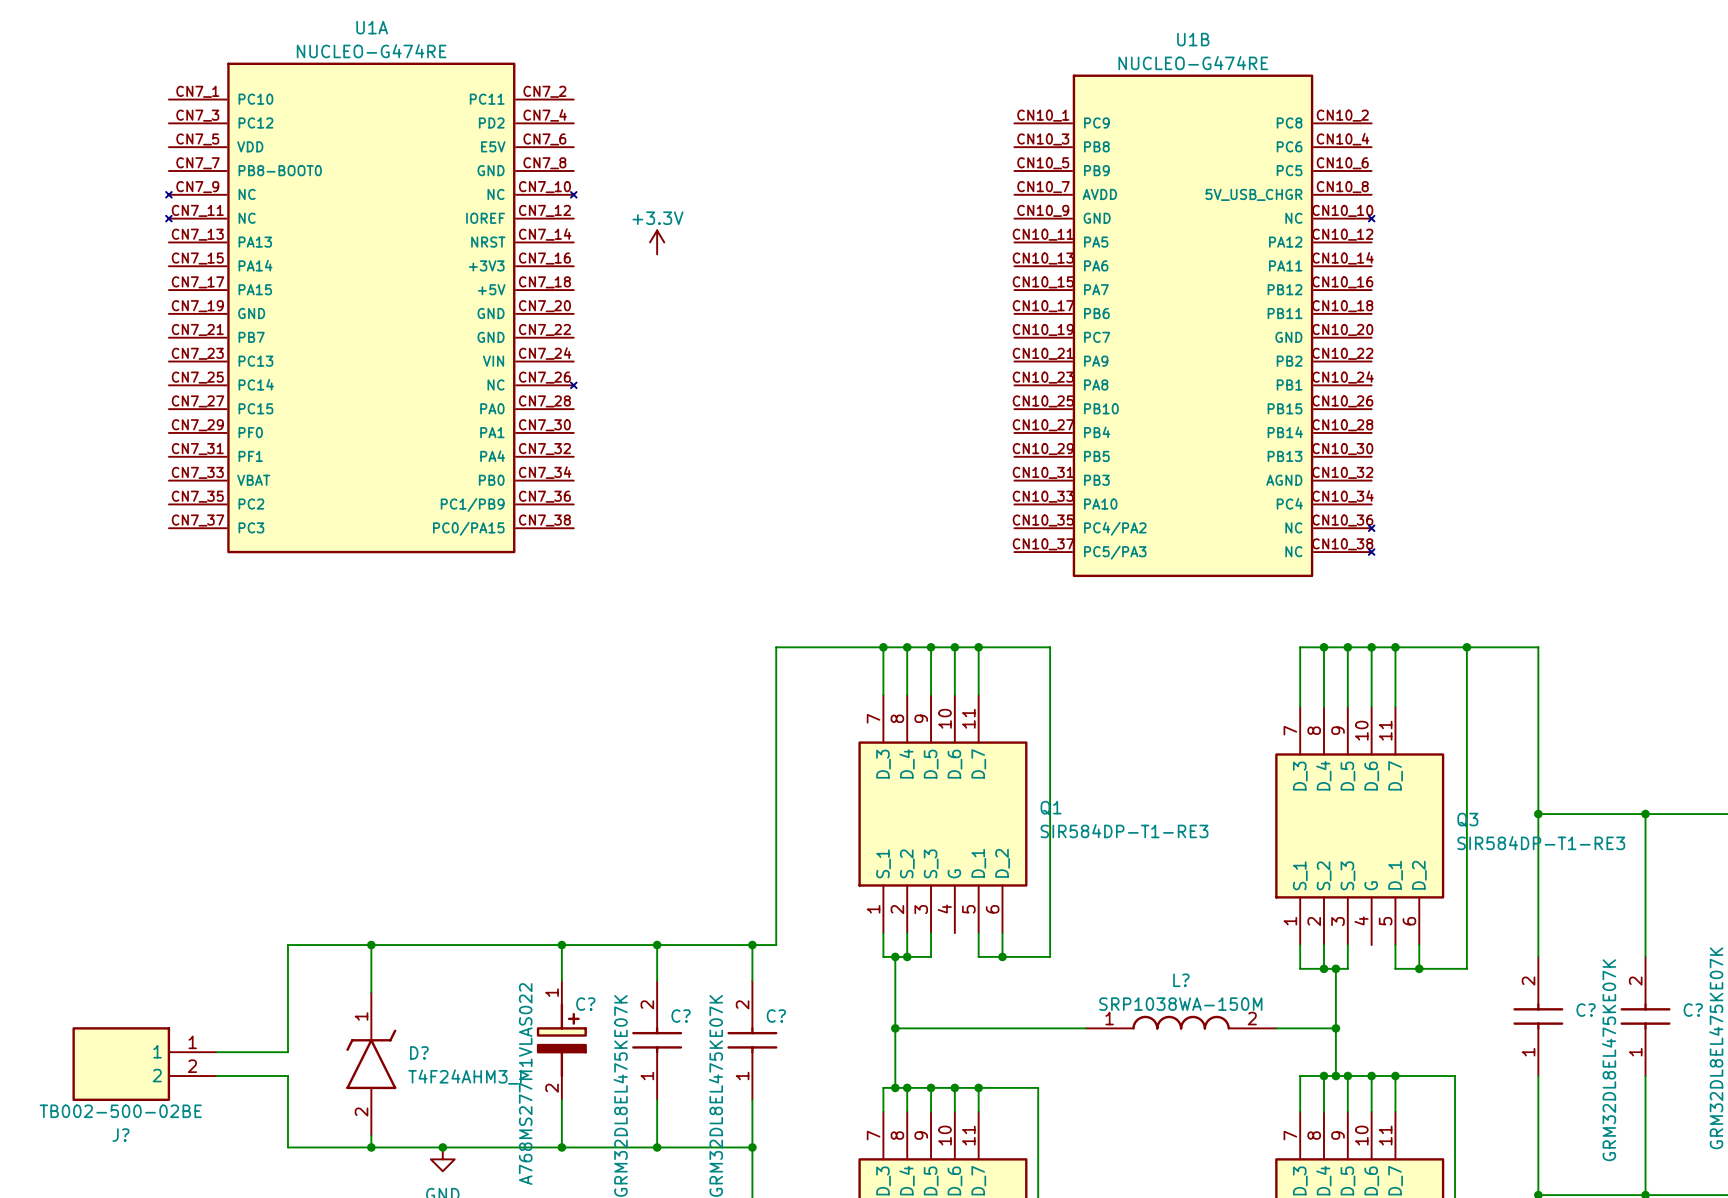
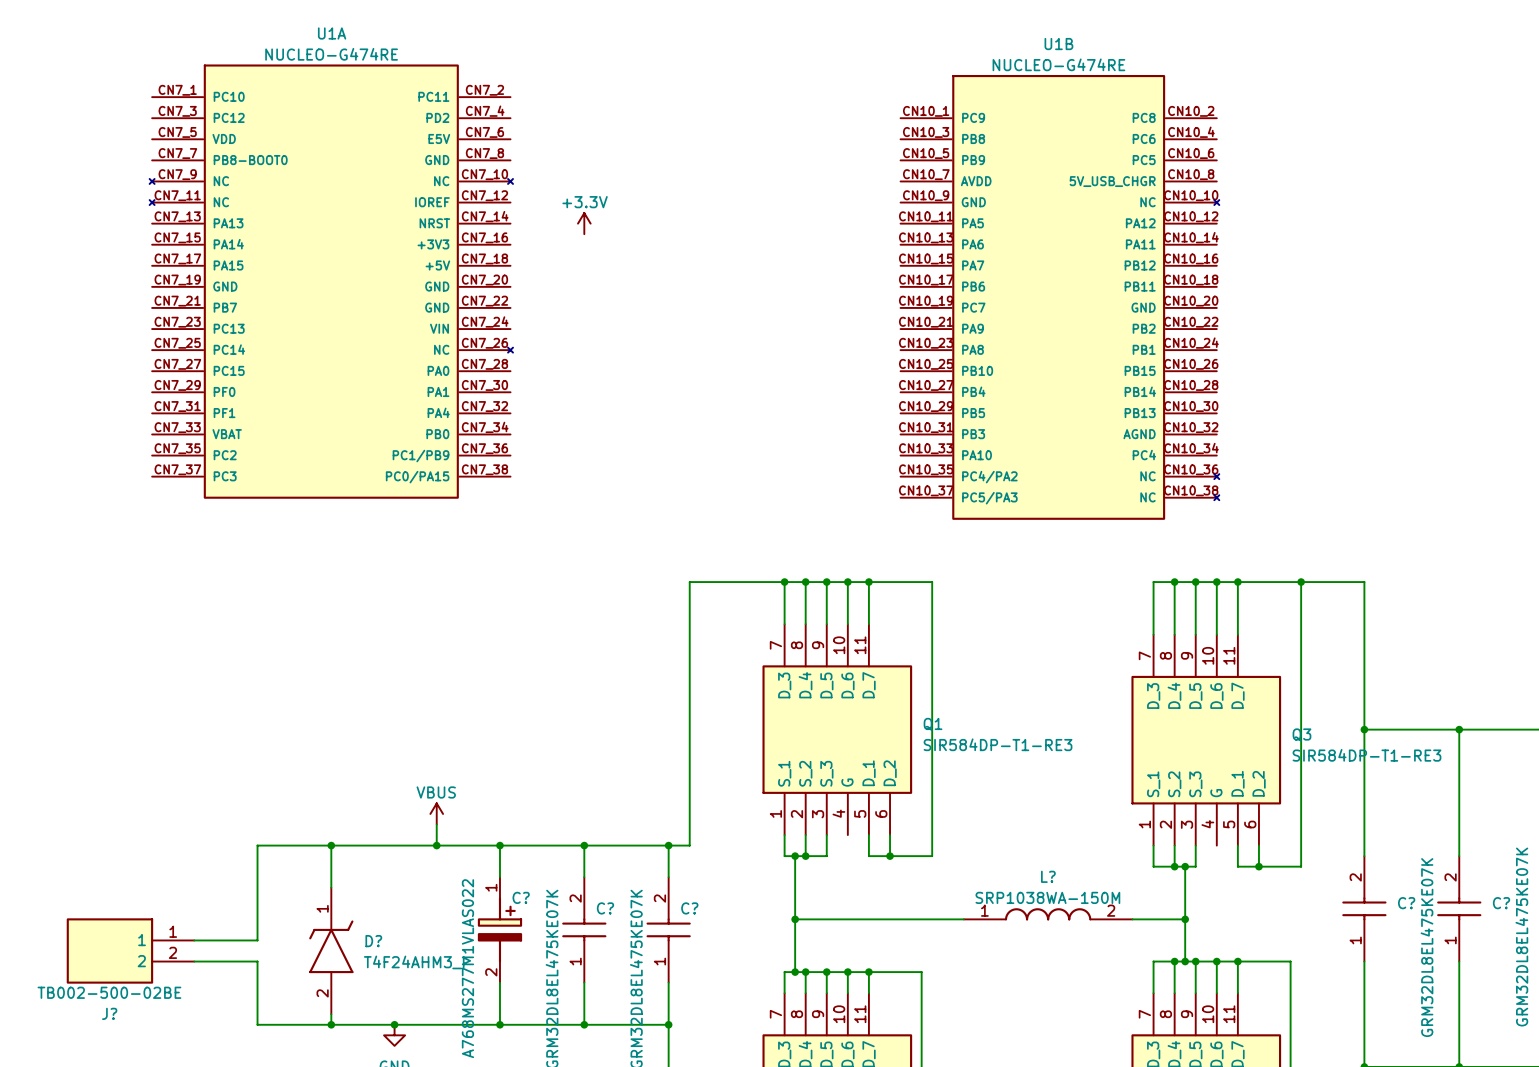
power symbol: none -> VBUS (436, 813)
wire: none -> (436, 824) (436, 845)
junction: none -> (436, 845)

